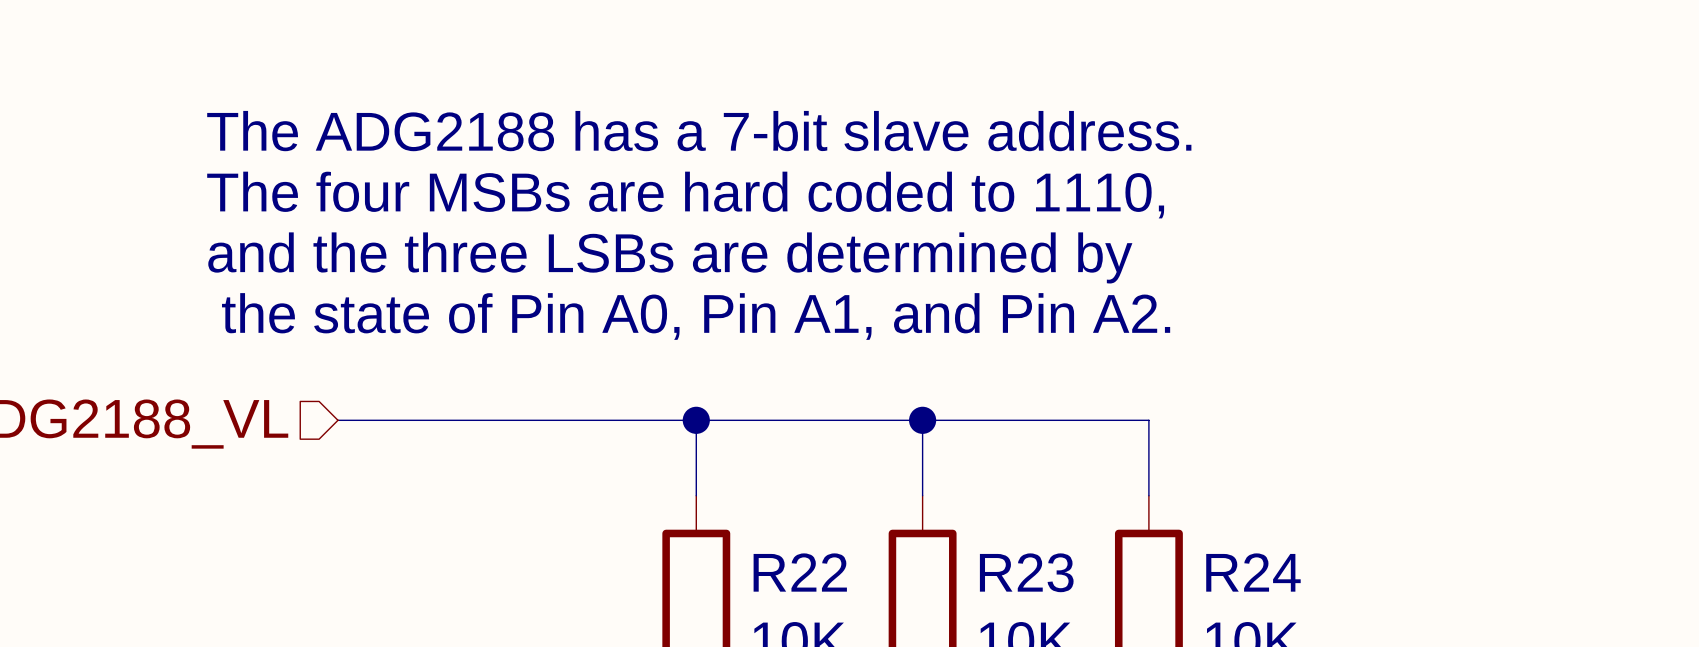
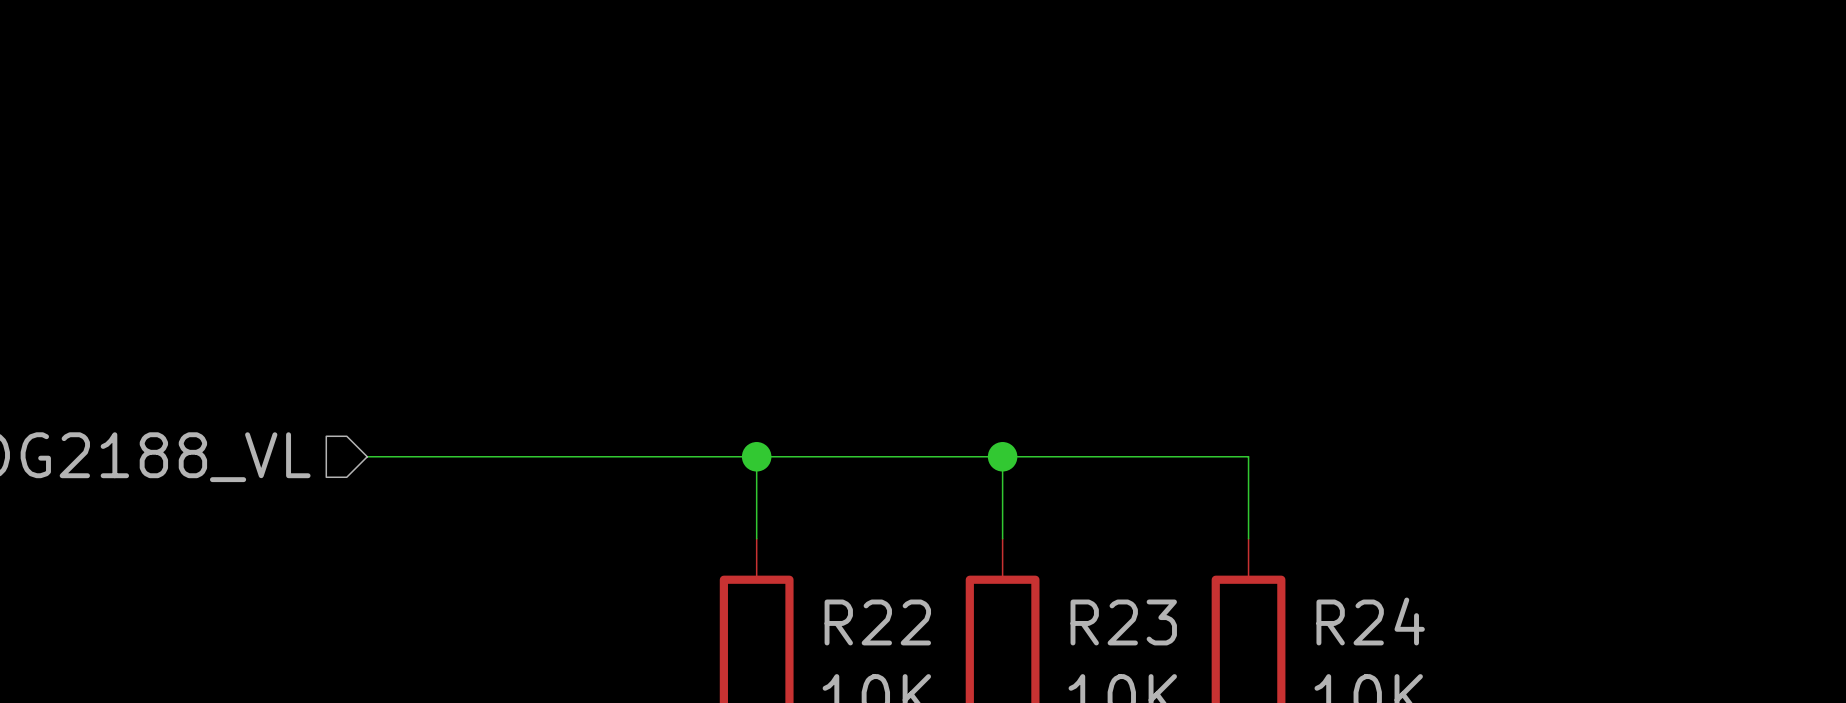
text: The ADG2188 has a 7-bit slave address. (699, 131) -> none
text: The four MSBs are hard coded to 1110, (685, 195) -> none
text: and the three LSBs are determined by (670, 257) -> none
text: the state of Pin A0, Pin A1, and Pin A2. (696, 316) -> none

